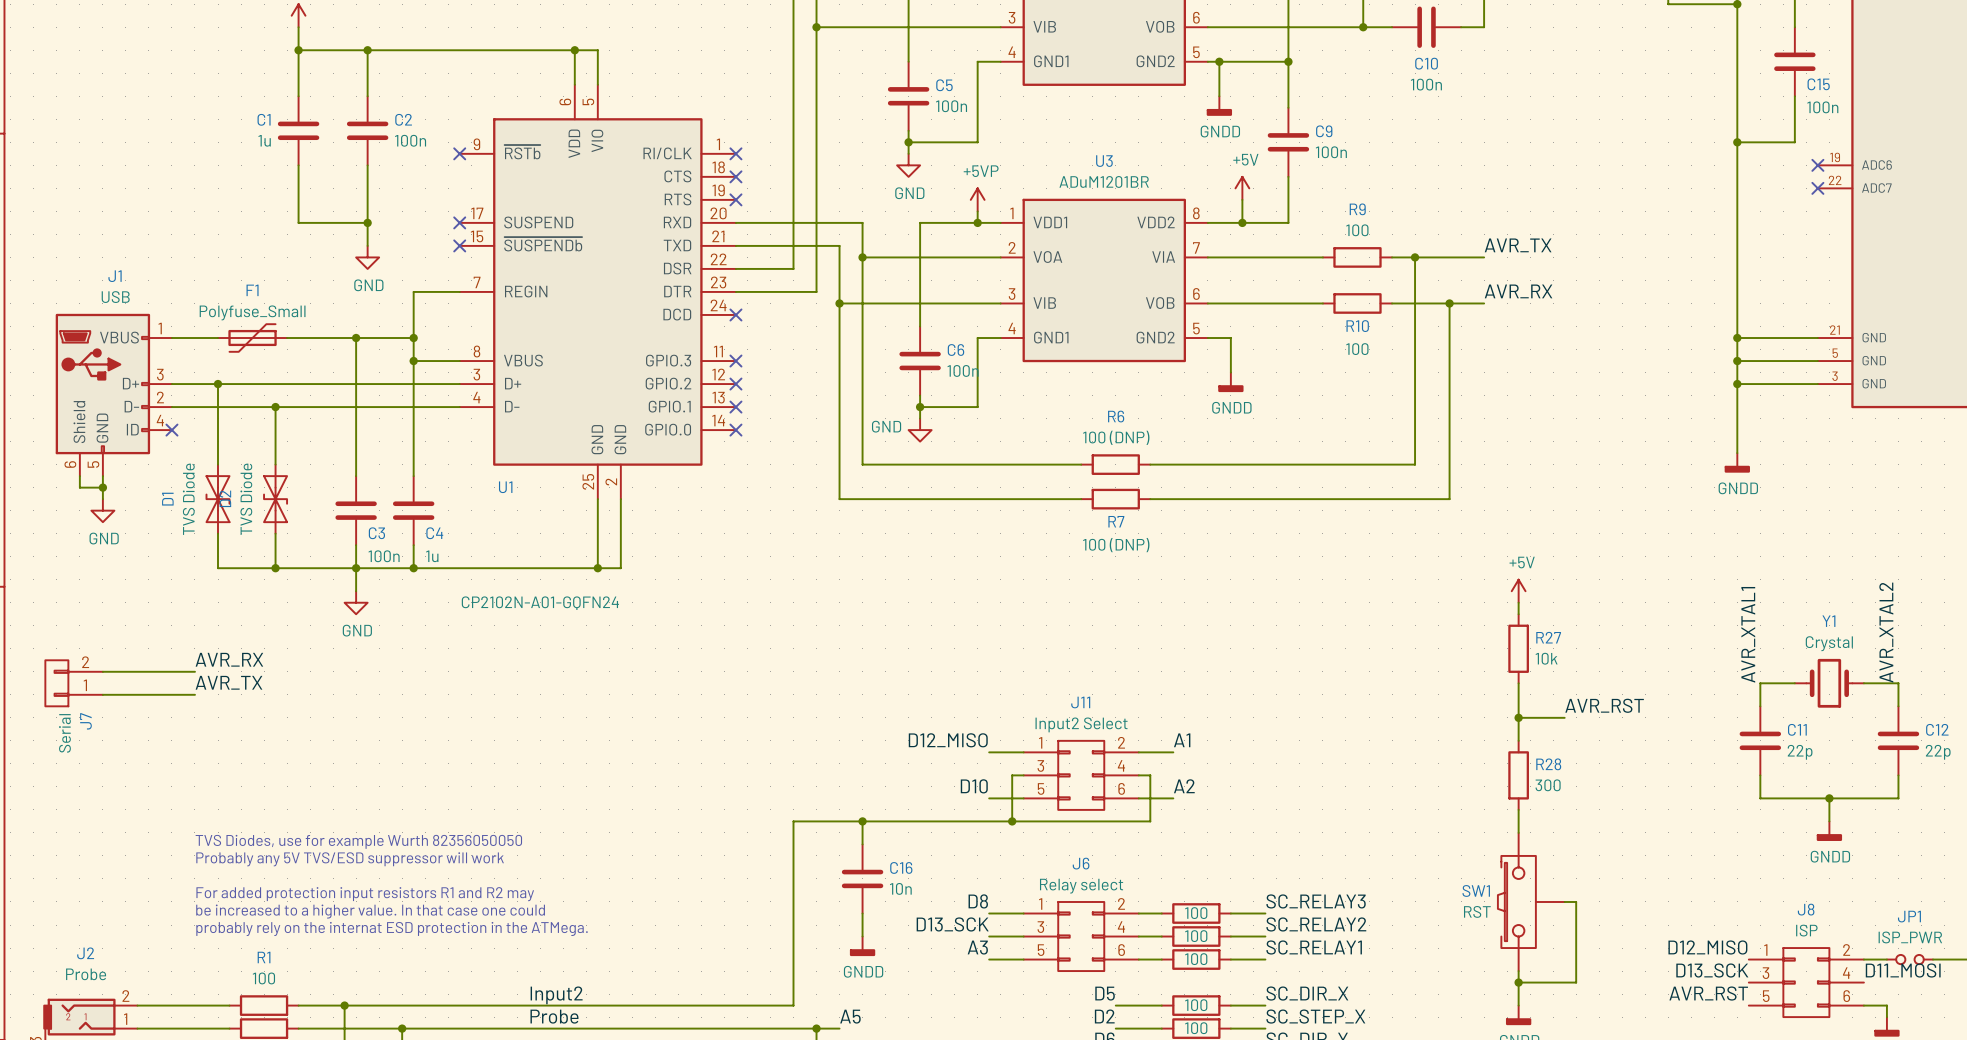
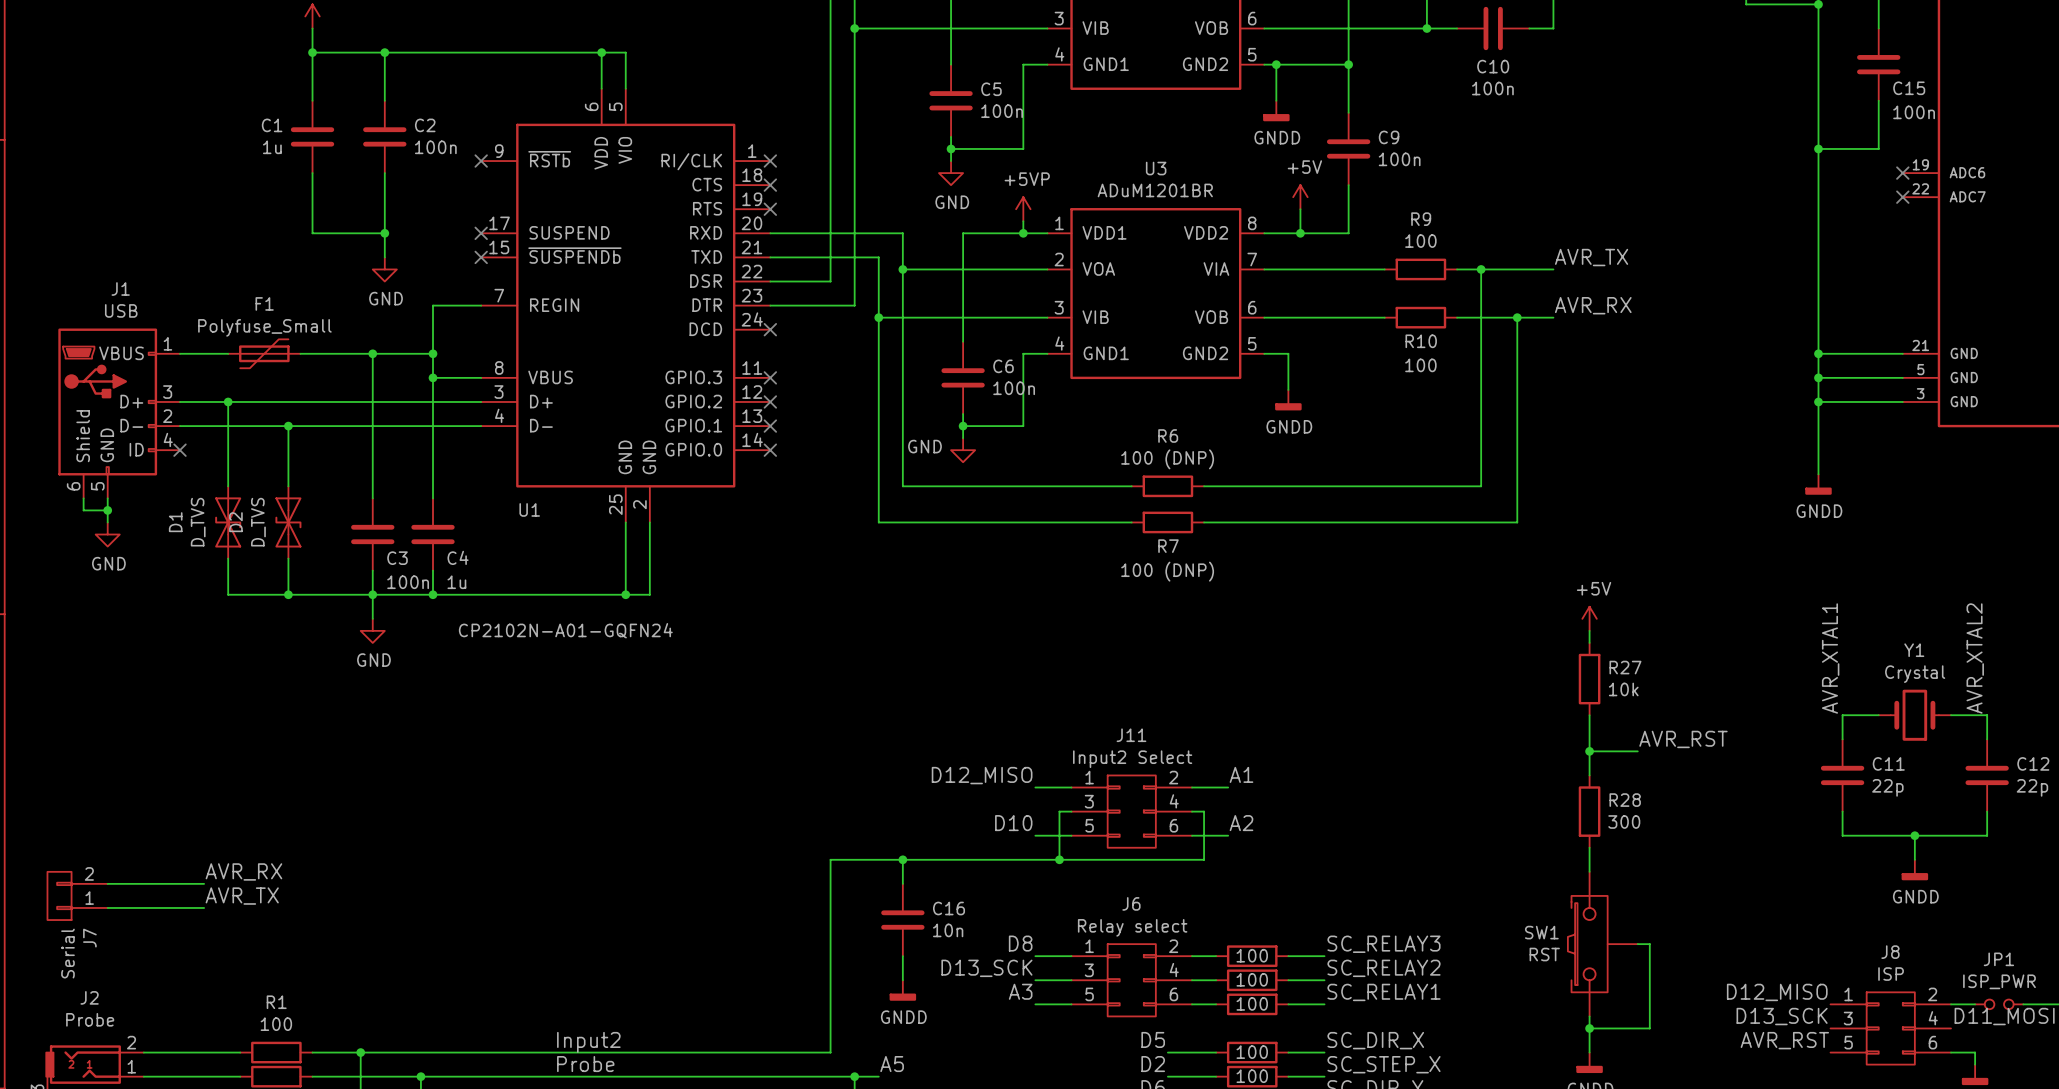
D1 value: TVS Diode (188, 499) -> D_TVS (198, 522)
D2 value: TVS Diode (246, 499) -> D_TVS (258, 522)
label position: AVR_RX (229, 659) -> AVR_RX (243, 871)
wire: (102, 671) (194, 671) -> (107, 907) (204, 907)
label position: AVR_TX (228, 682) -> AVR_TX (242, 896)
J7 position: (74, 683) -> (77, 895)
wire: (102, 694) (194, 694) -> (107, 883) (204, 883)
text: TVS Diodes, use for example Wurth 82356050050 (358, 841) -> none
text: Probably any 5V TVS/ESD suppressor will work (350, 859) -> none
text: For added protection input resistors R1 and R2 may (365, 894) -> none
text: be increased to a higher value. In that case one could (370, 911) -> none
text: probably rely on the internat ESD protection in the ATMega. (392, 928) -> none

